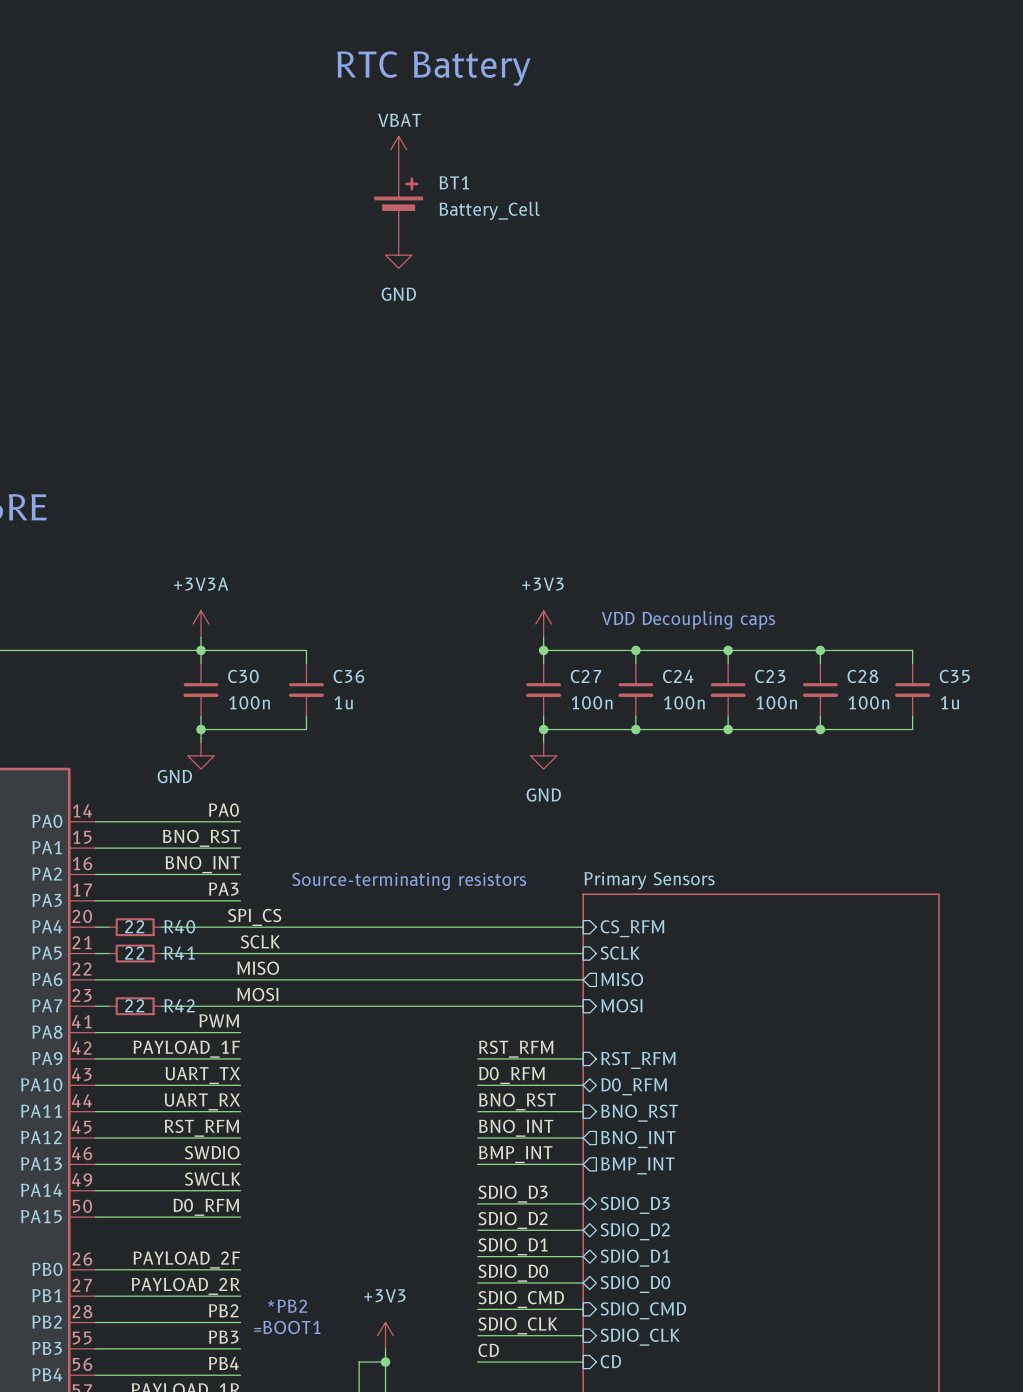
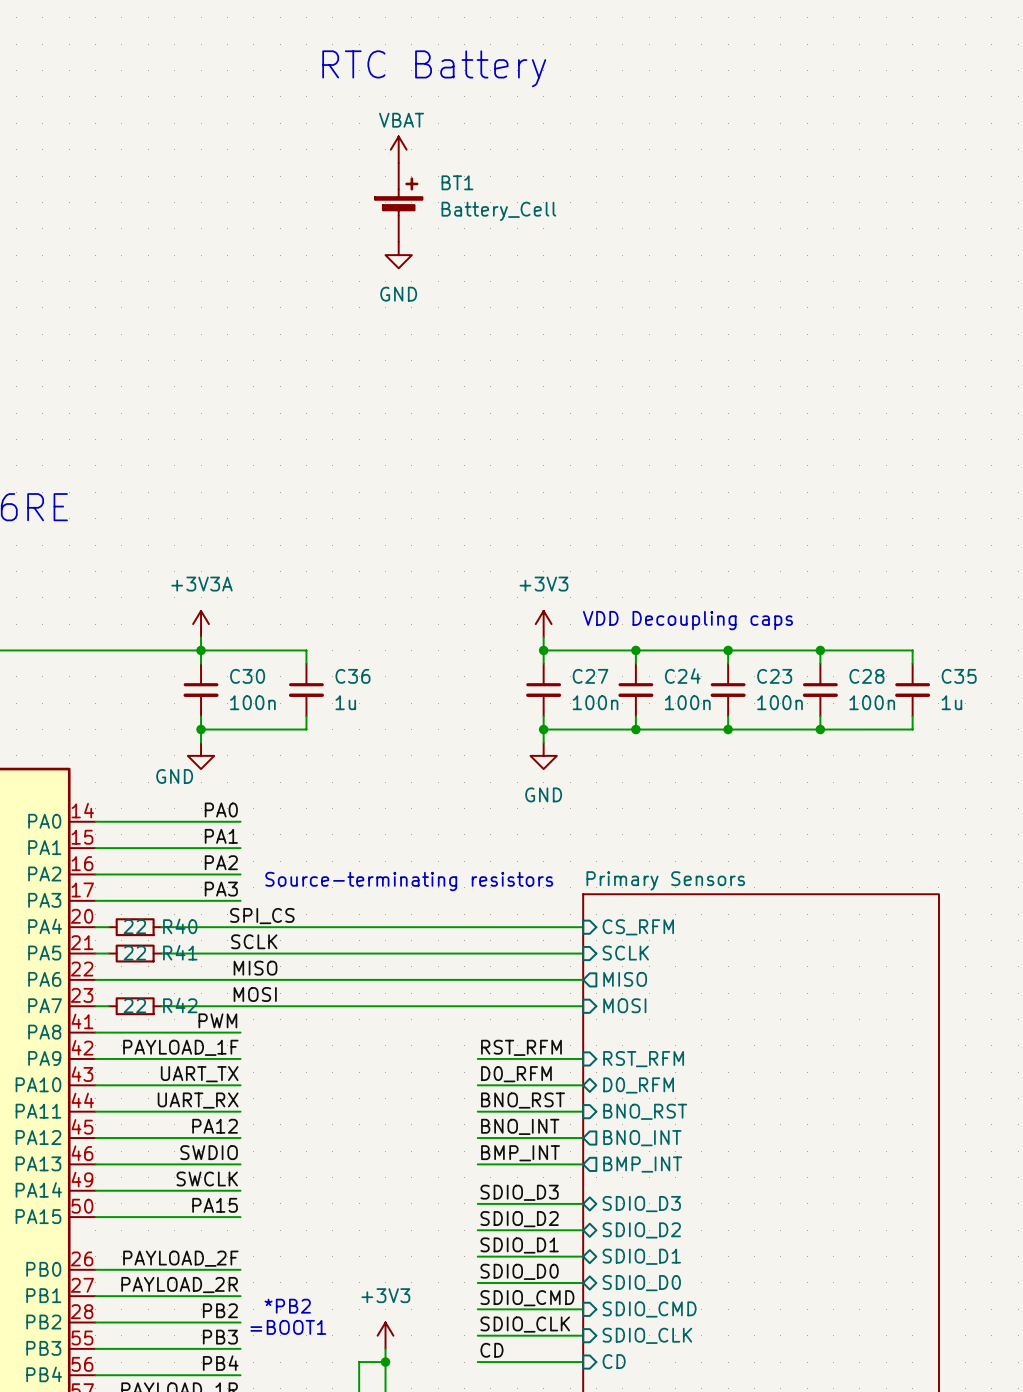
label: BNO_RST (201, 838) -> PA1 (221, 836)
label: BNO_INT (202, 864) -> PA2 (221, 862)
label: RST_RFM (201, 1128) -> PA12 (215, 1126)
label: D0_RFM (206, 1207) -> PA15 (215, 1205)

